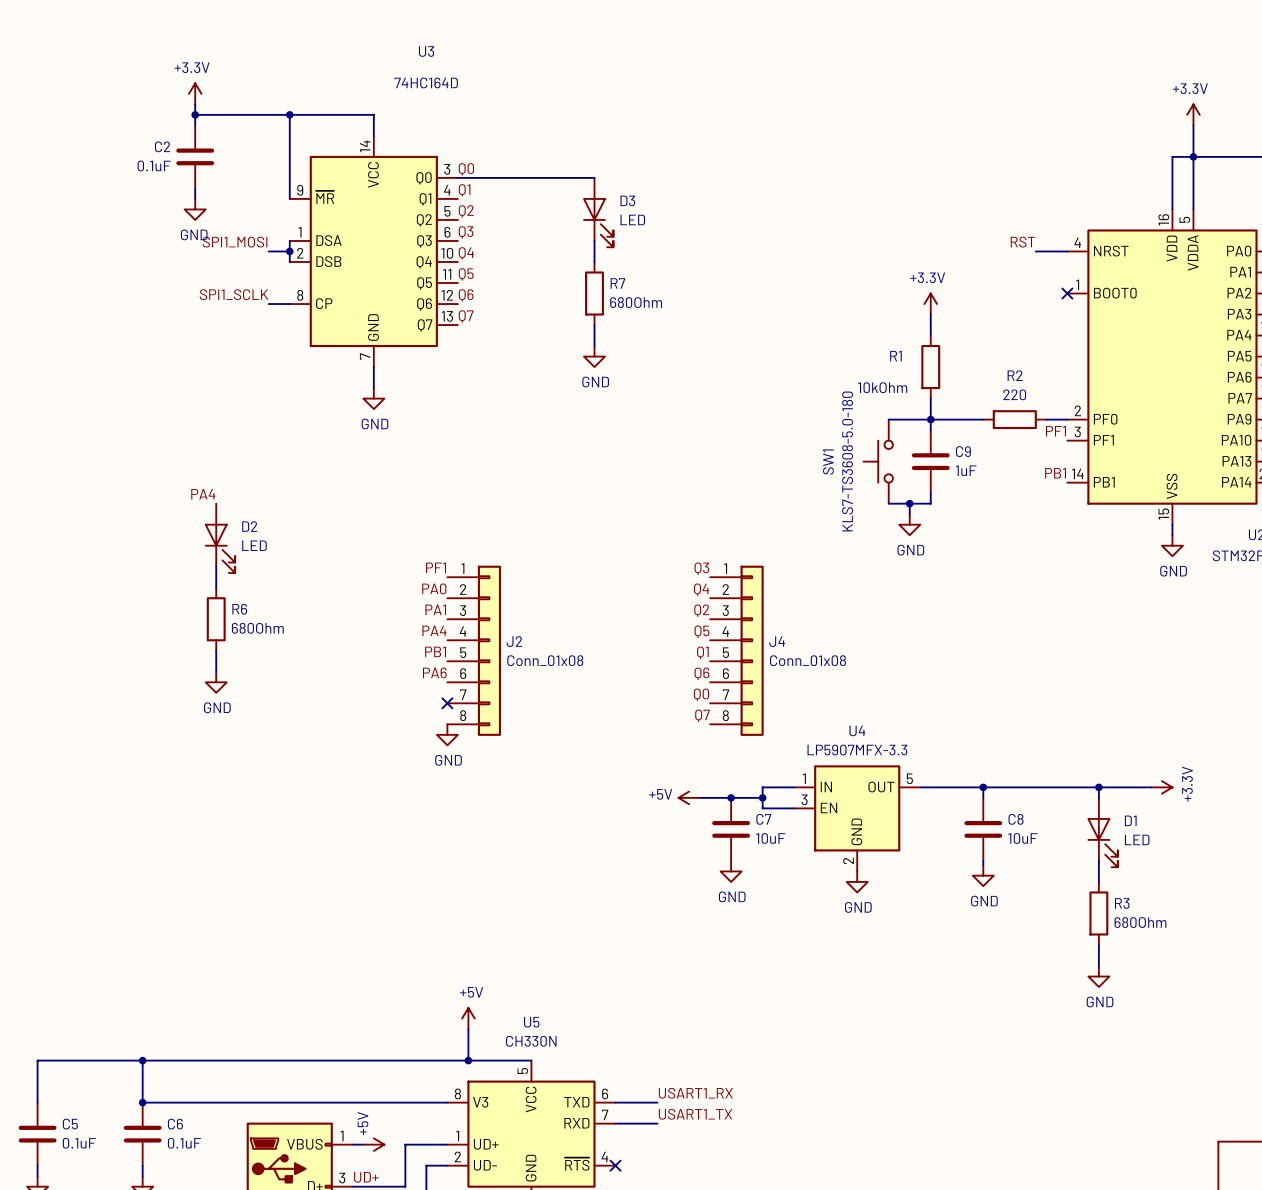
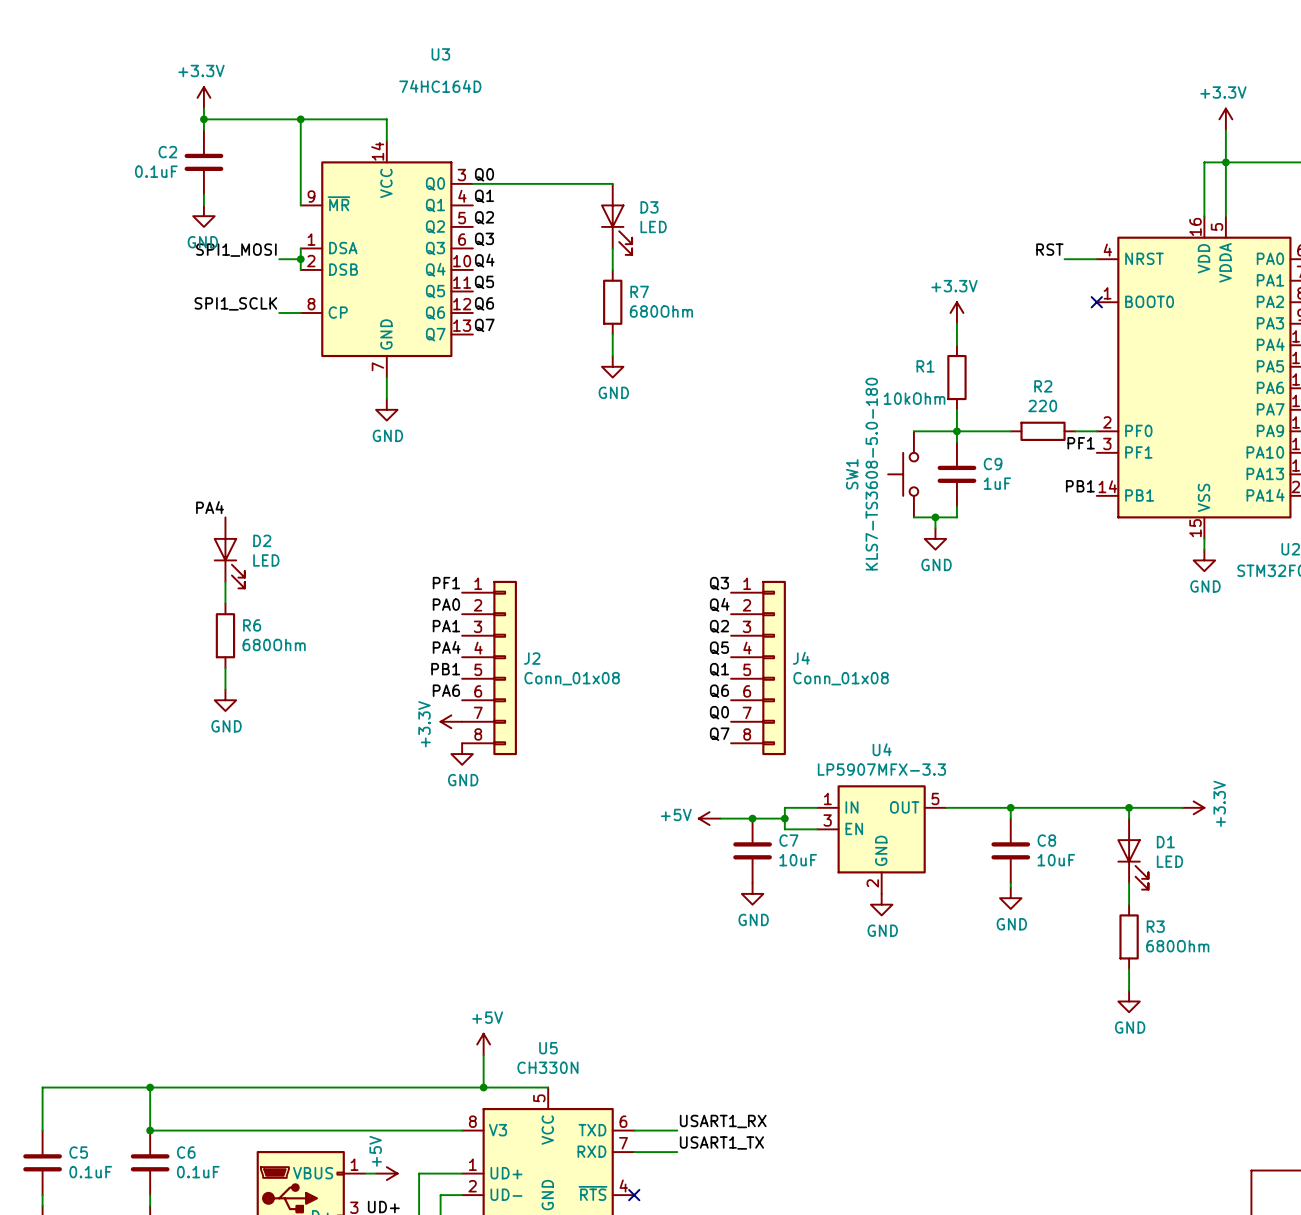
power symbol: none -> +3.3V (451, 721)
no-connect mark: (447, 703) -> none

